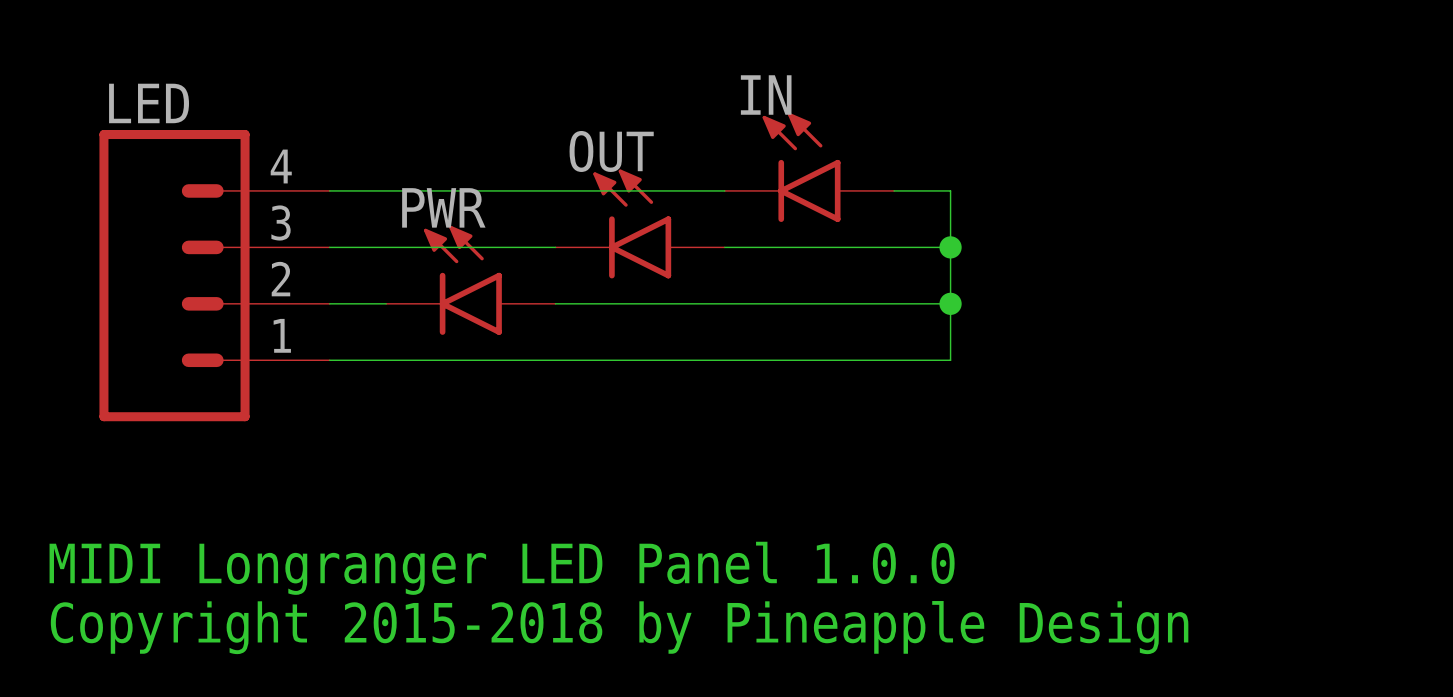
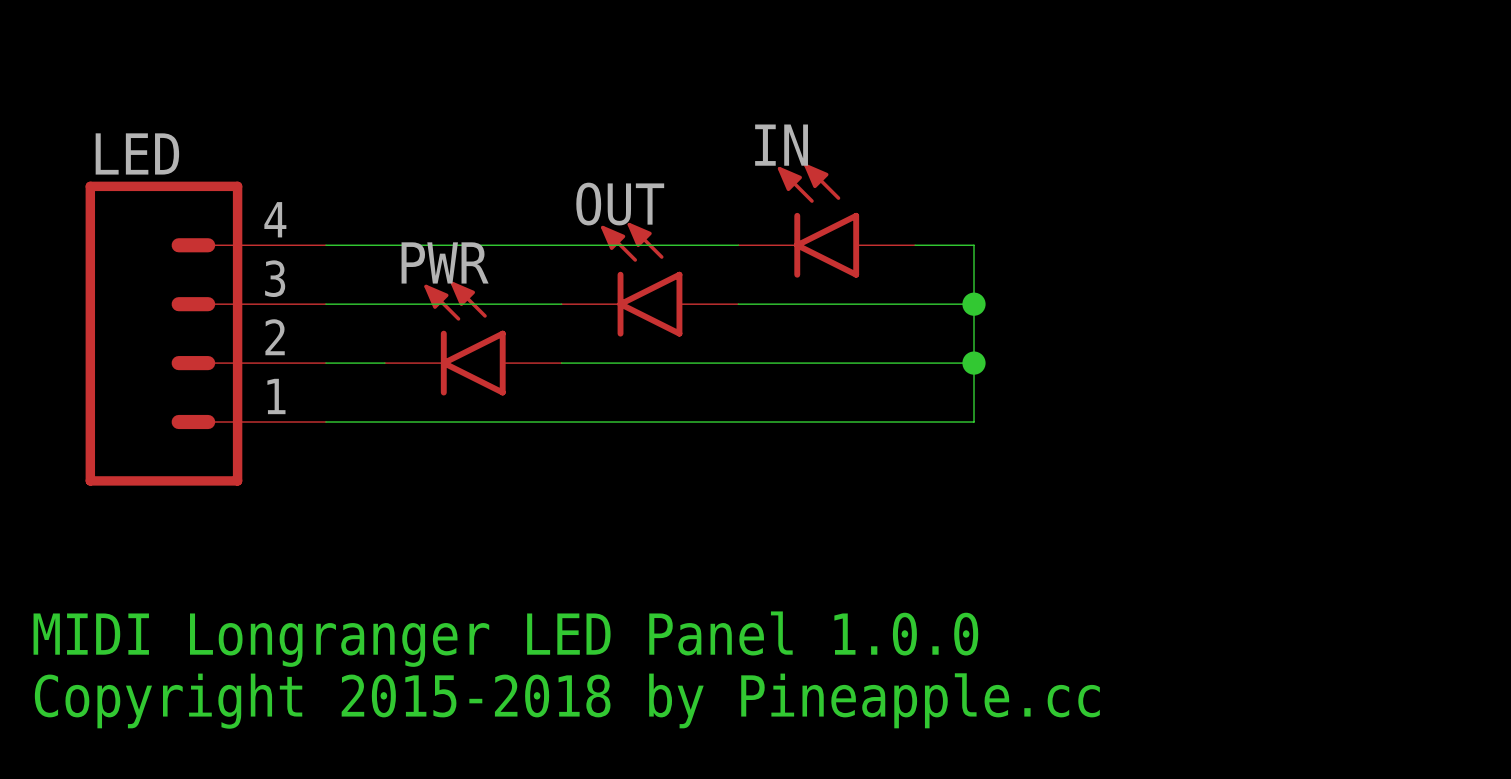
text: Copyright 2015-2018 by Pineapple Design (619, 627) -> Copyright 2015-2018 by Pineapple.cc (567, 701)

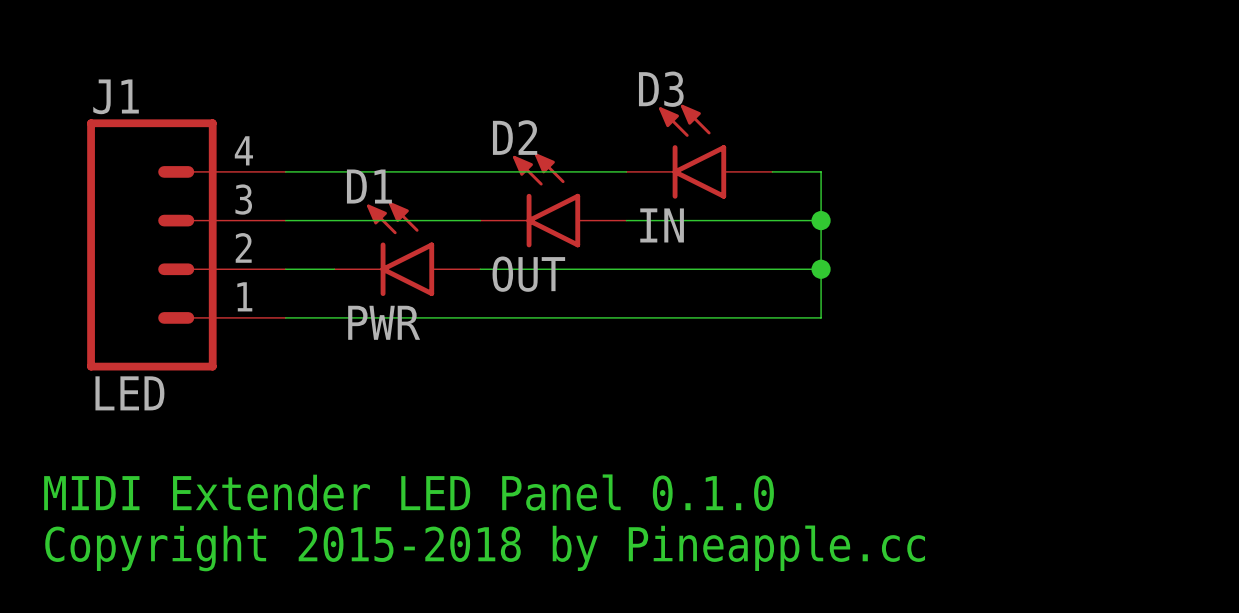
IN name: IN (781, 145) -> D3 (661, 89)
LED name: LED (137, 153) -> J1 (116, 96)
OUT name: OUT (620, 204) -> D2 (515, 137)
PWR name: PWR (445, 262) -> D1 (369, 186)
IN value: none -> IN (662, 225)
OUT value: none -> OUT (528, 274)
PWR value: none -> PWR (384, 322)
LED value: none -> LED (129, 393)
text: MIDI Longranger LED Panel 1.0.0 (505, 639) -> MIDI Extender LED Panel 0.1.0 (409, 492)

